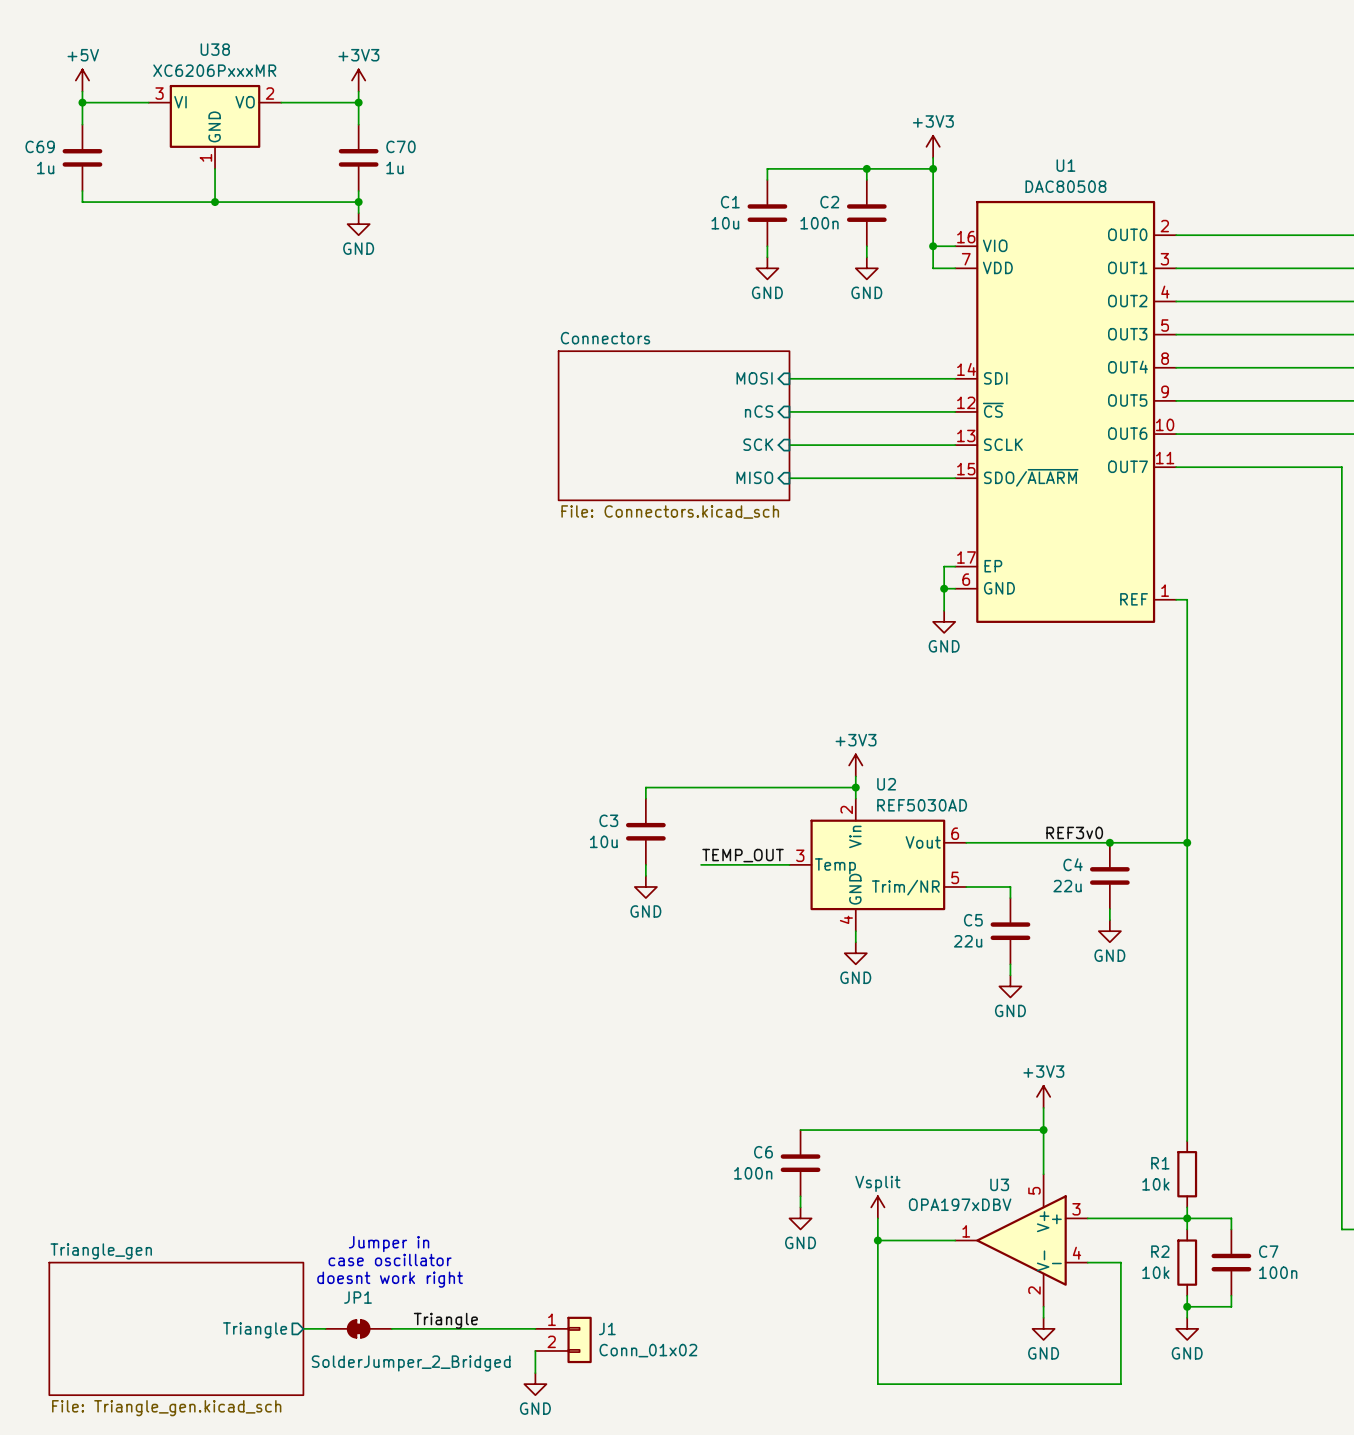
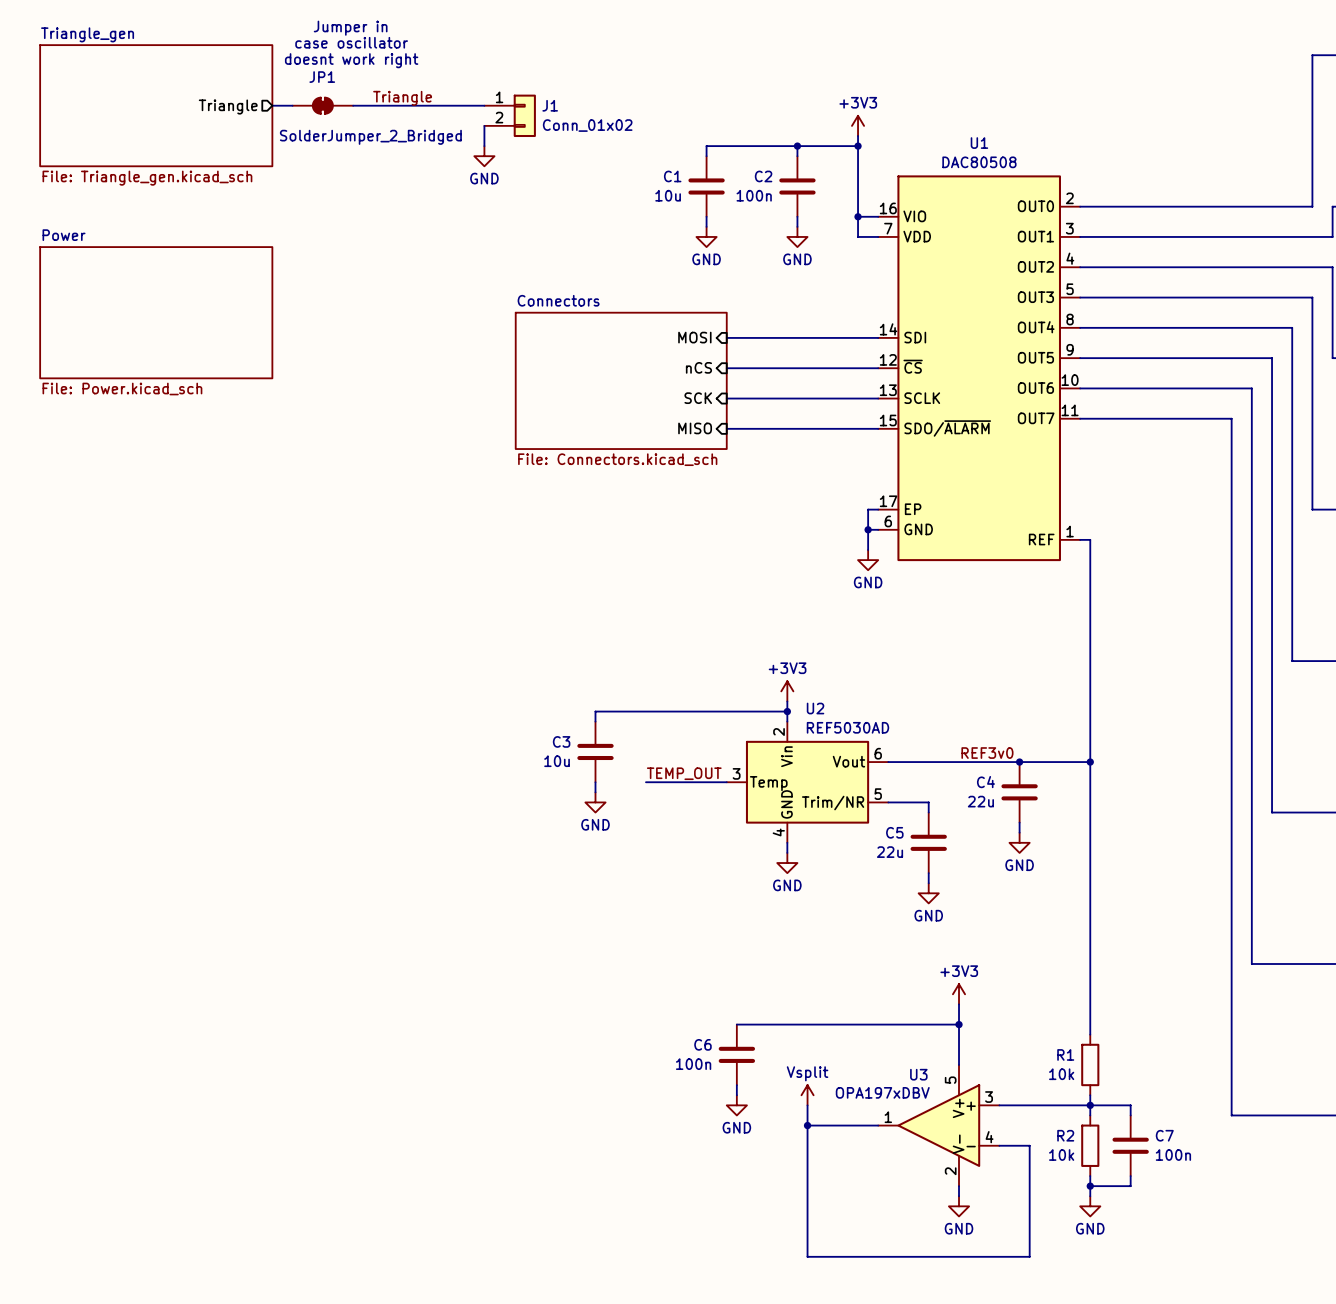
text: none -> Jumper in (350, 28)
text: none -> case oscillator (351, 42)
text: none -> doesnt work right (351, 60)
power symbol: +5V (82, 80) -> none
power symbol: +3V3 (358, 80) -> none
wire: (82, 91) (82, 124) -> none
wire: (358, 91) (358, 124) -> none
wire: (82, 102) (148, 102) -> none
junction: (82, 102) -> none
wire: (281, 102) (358, 102) -> none
junction: (358, 102) -> none
label: none -> Triangle (402, 98)
sheet Triangle_gen: none -> File: Triangle_gen.kicad_sch (156, 105)
wire: none -> (272, 105) (292, 105)
wire: none -> (353, 105) (484, 105)
U38: XC6206PxxxMR (215, 126) -> none
sheet pin: none -> Triangle (228, 107)
C69: 1u (82, 157) -> none
C70: 1u (358, 157) -> none
wire: (215, 168) (215, 202) -> none
wire: (82, 191) (82, 202) (358, 202) -> none
wire: (358, 191) (358, 213) -> (484, 125) (484, 146)
junction: (215, 202) -> none
junction: (358, 202) -> none
power symbol position: GND (358, 224) -> GND (484, 156)
sheet Power: none -> File: Power.kicad_sch (156, 312)
text: Jumper in (389, 1244) -> none
text: case oscillator (390, 1260) -> none
text: doesnt work right (390, 1279) -> none
label: Triangle (445, 1320) -> none
sheet Triangle_gen: File: Triangle_gen.kicad_sch (176, 1328) -> none
wire: (303, 1328) (325, 1328) -> none
JP1 position: (358, 1328) -> (322, 105)
wire: (391, 1328) (535, 1328) -> none
sheet pin: Triangle (255, 1330) -> none
J1 position: (563, 1339) -> (510, 115)
wire: (535, 1350) (535, 1373) -> none
power symbol: GND (535, 1384) -> none

